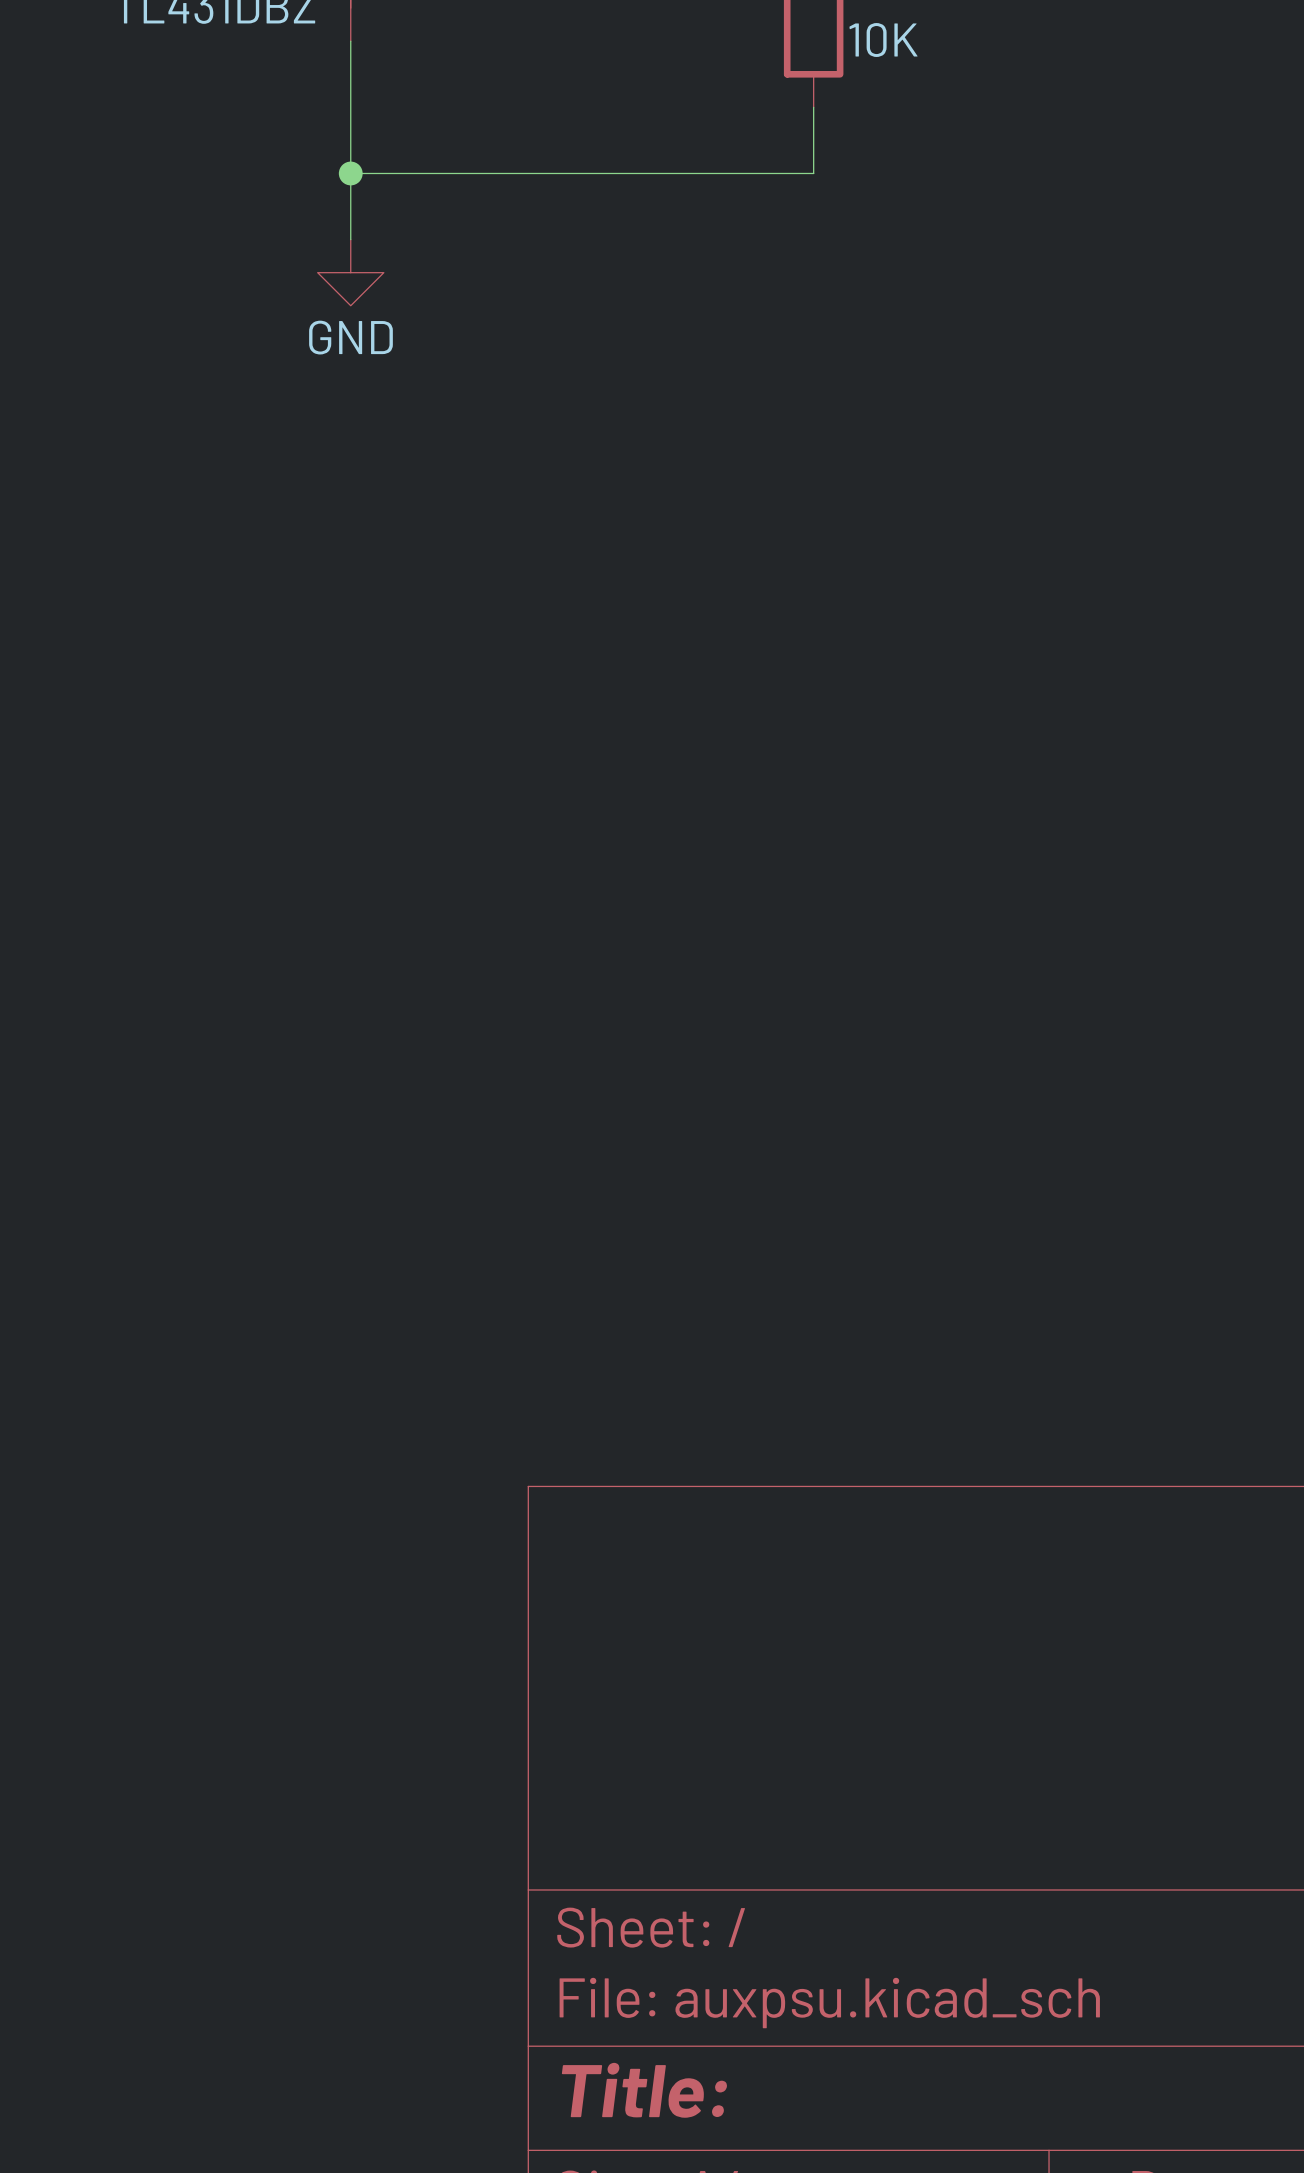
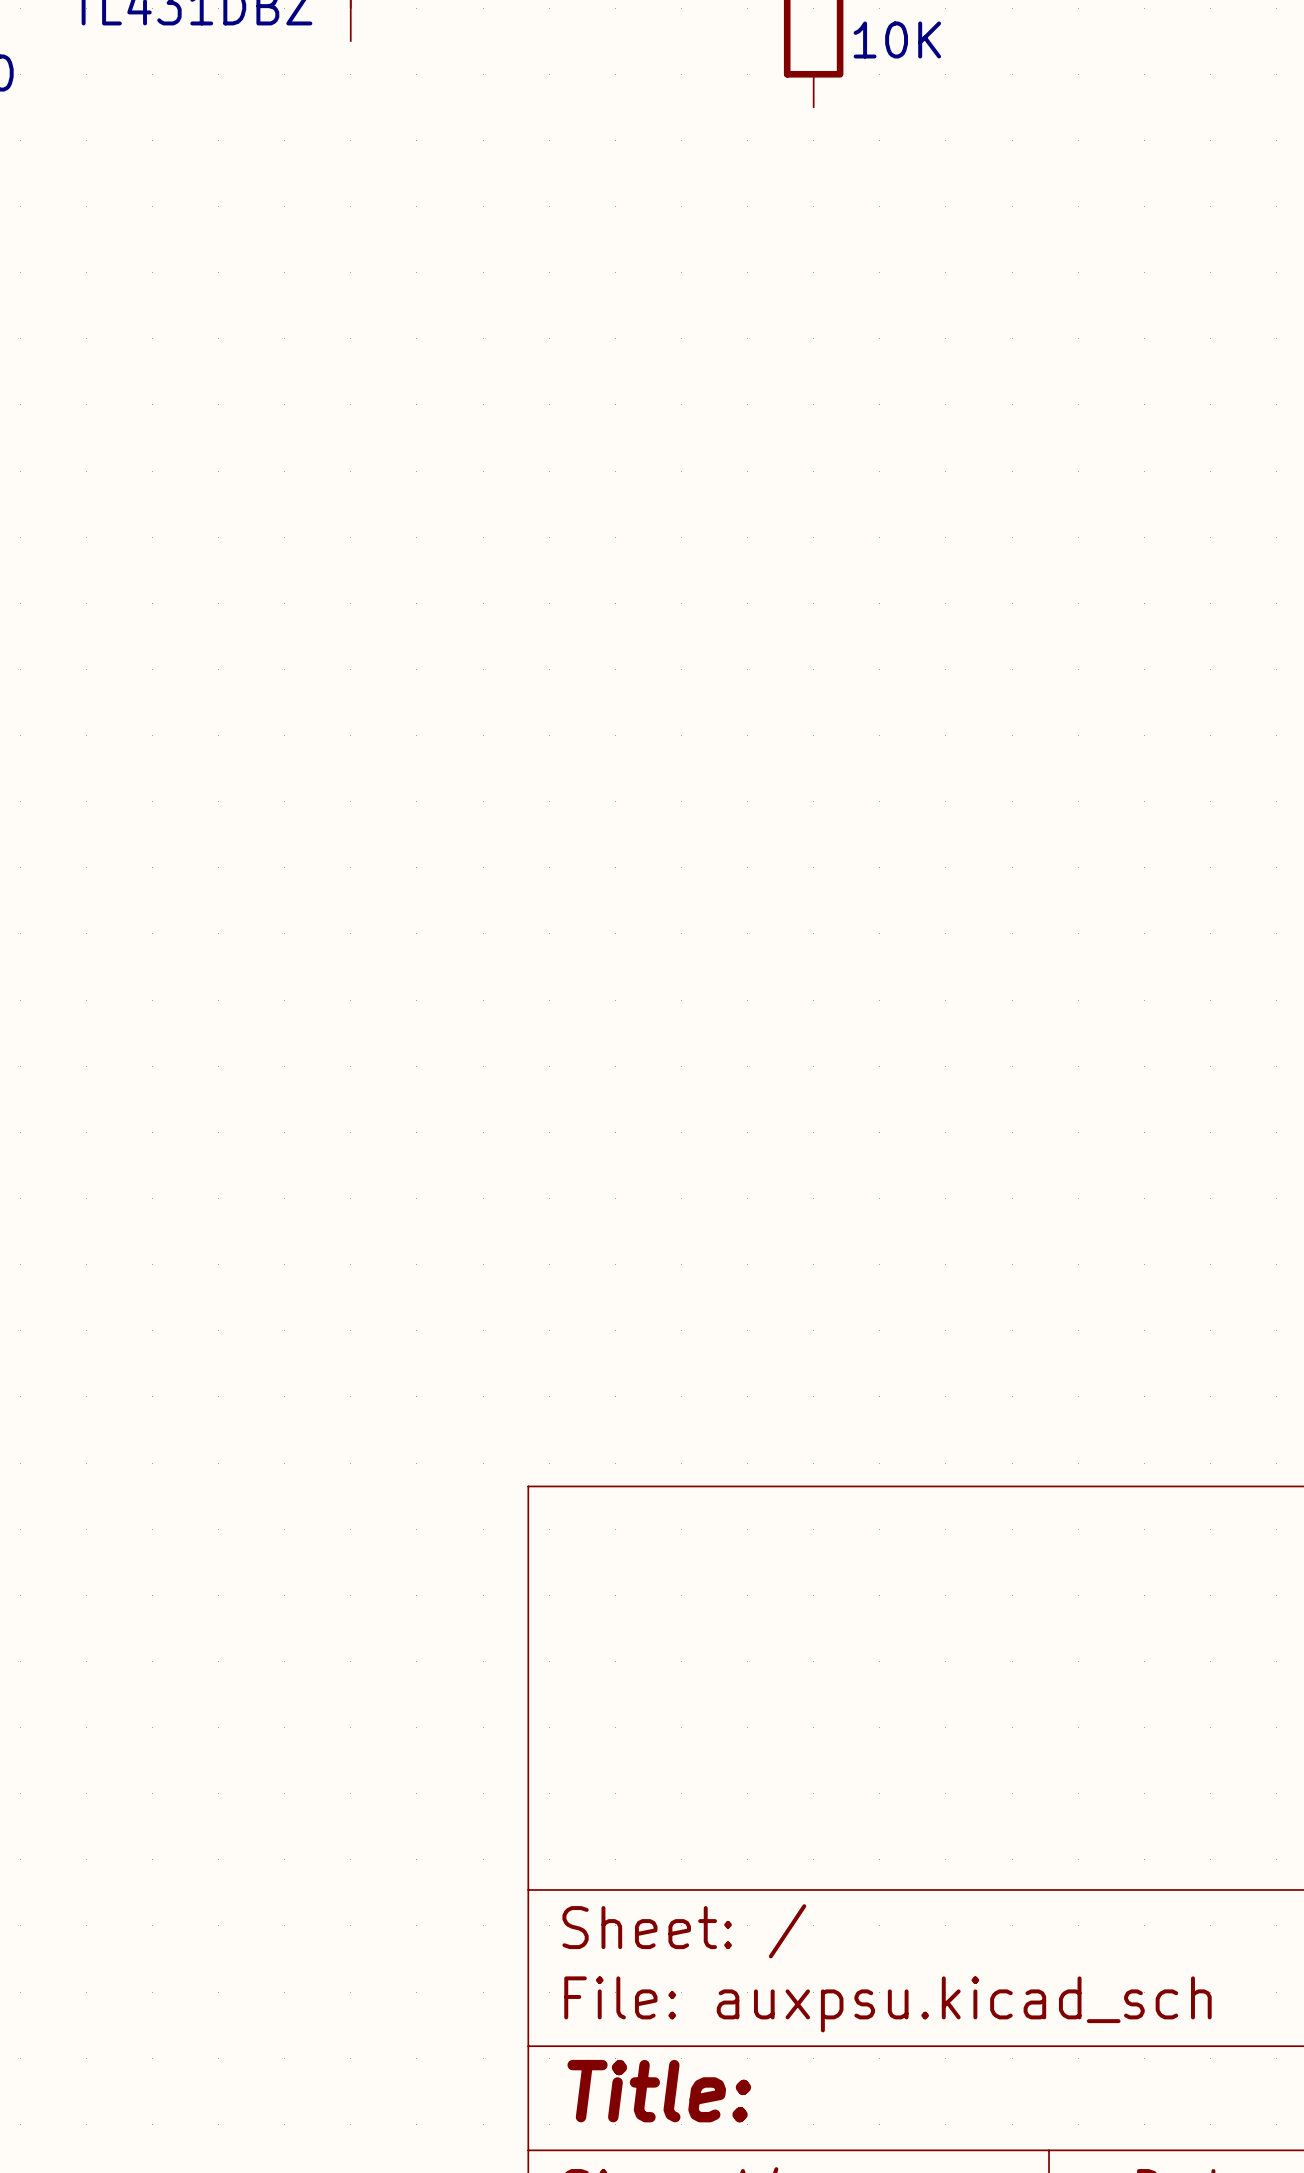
wire: (350, 41) (350, 239) -> none
wire: (813, 107) (813, 173) (350, 173) -> none
junction: (350, 173) -> none
power symbol: GND (350, 272) -> none

